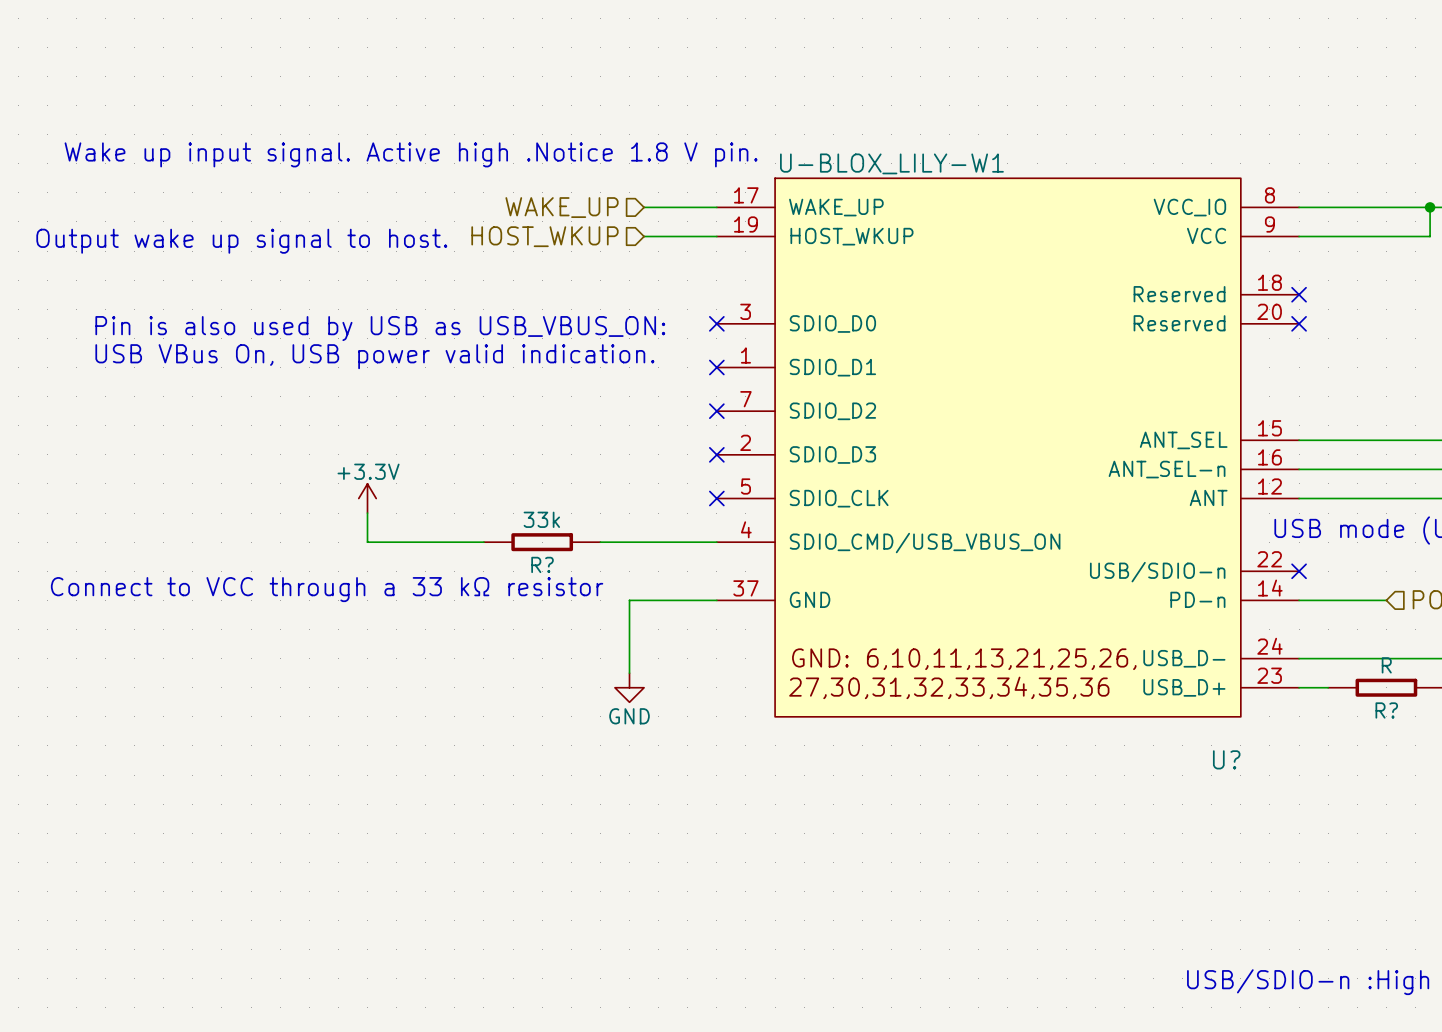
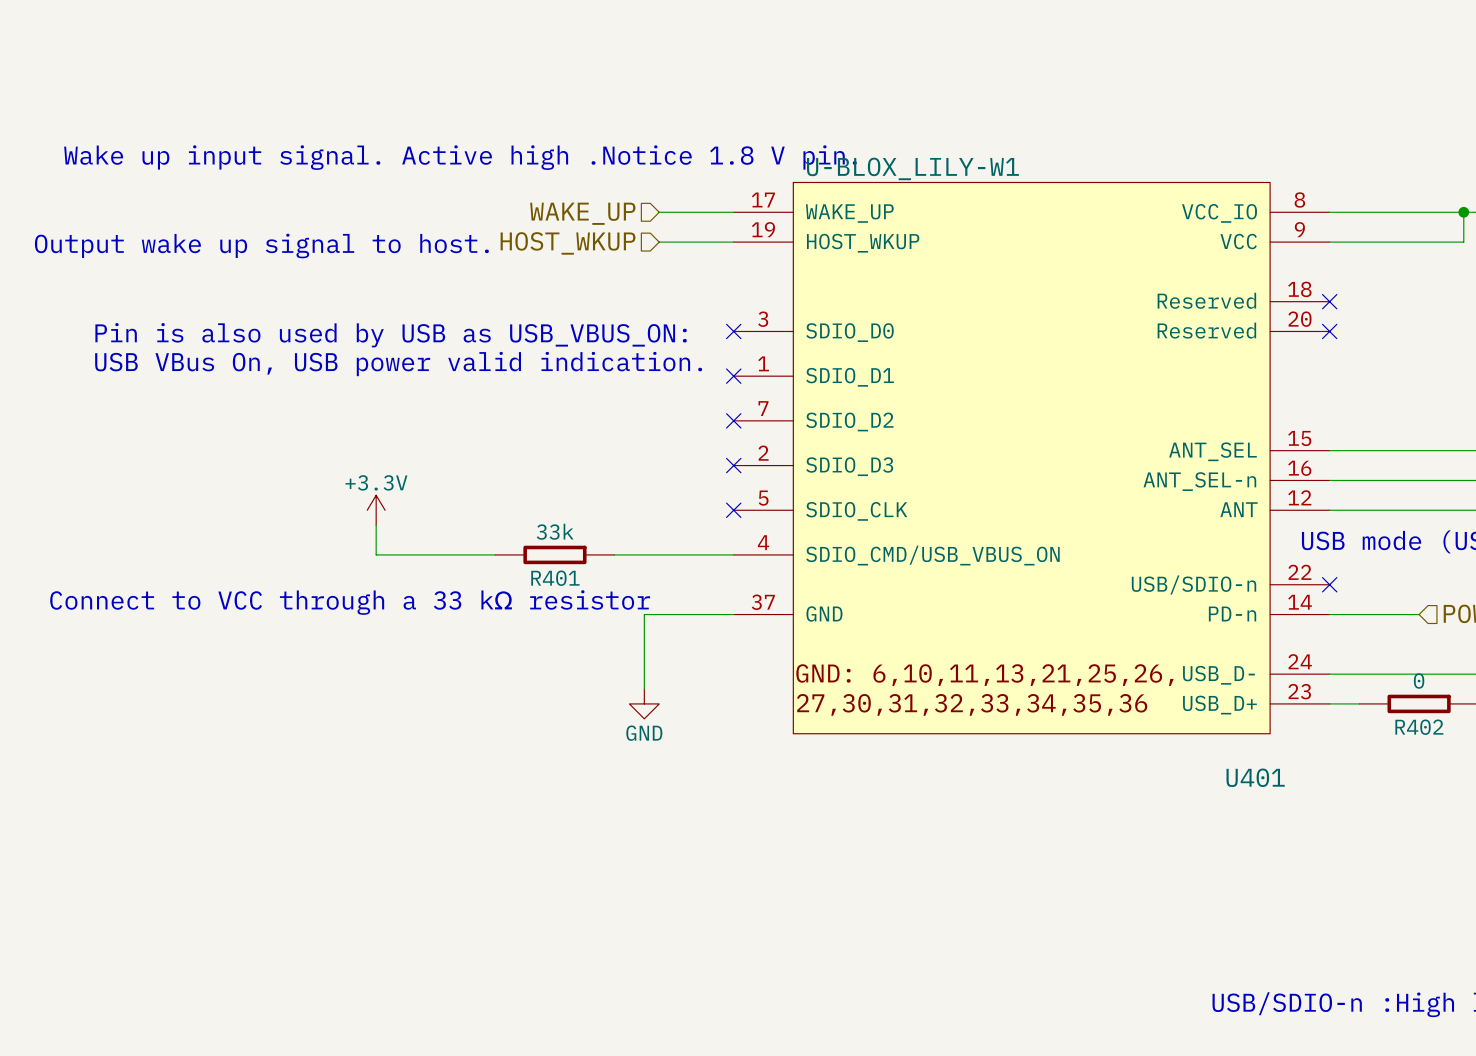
R? name: R? (542, 564) -> R401 (555, 578)
R? value: R (1386, 665) -> 0 (1419, 681)
R? name: R? (1386, 710) -> R402 (1419, 727)
U? name: U? (1226, 759) -> U401 (1255, 777)

